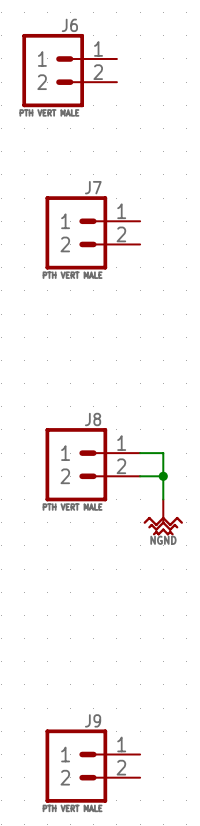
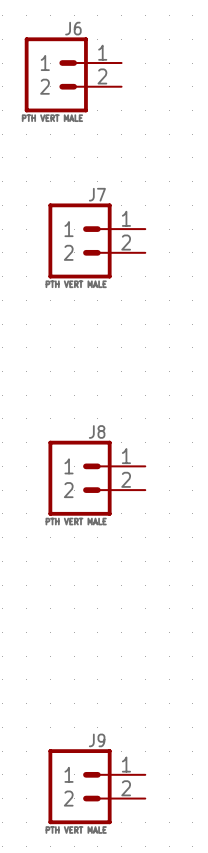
wire: (140, 453) (163, 453) (163, 499) -> none
wire: (140, 476) (163, 476) -> none
junction: (163, 476) -> none
power symbol: (163, 517) -> none

